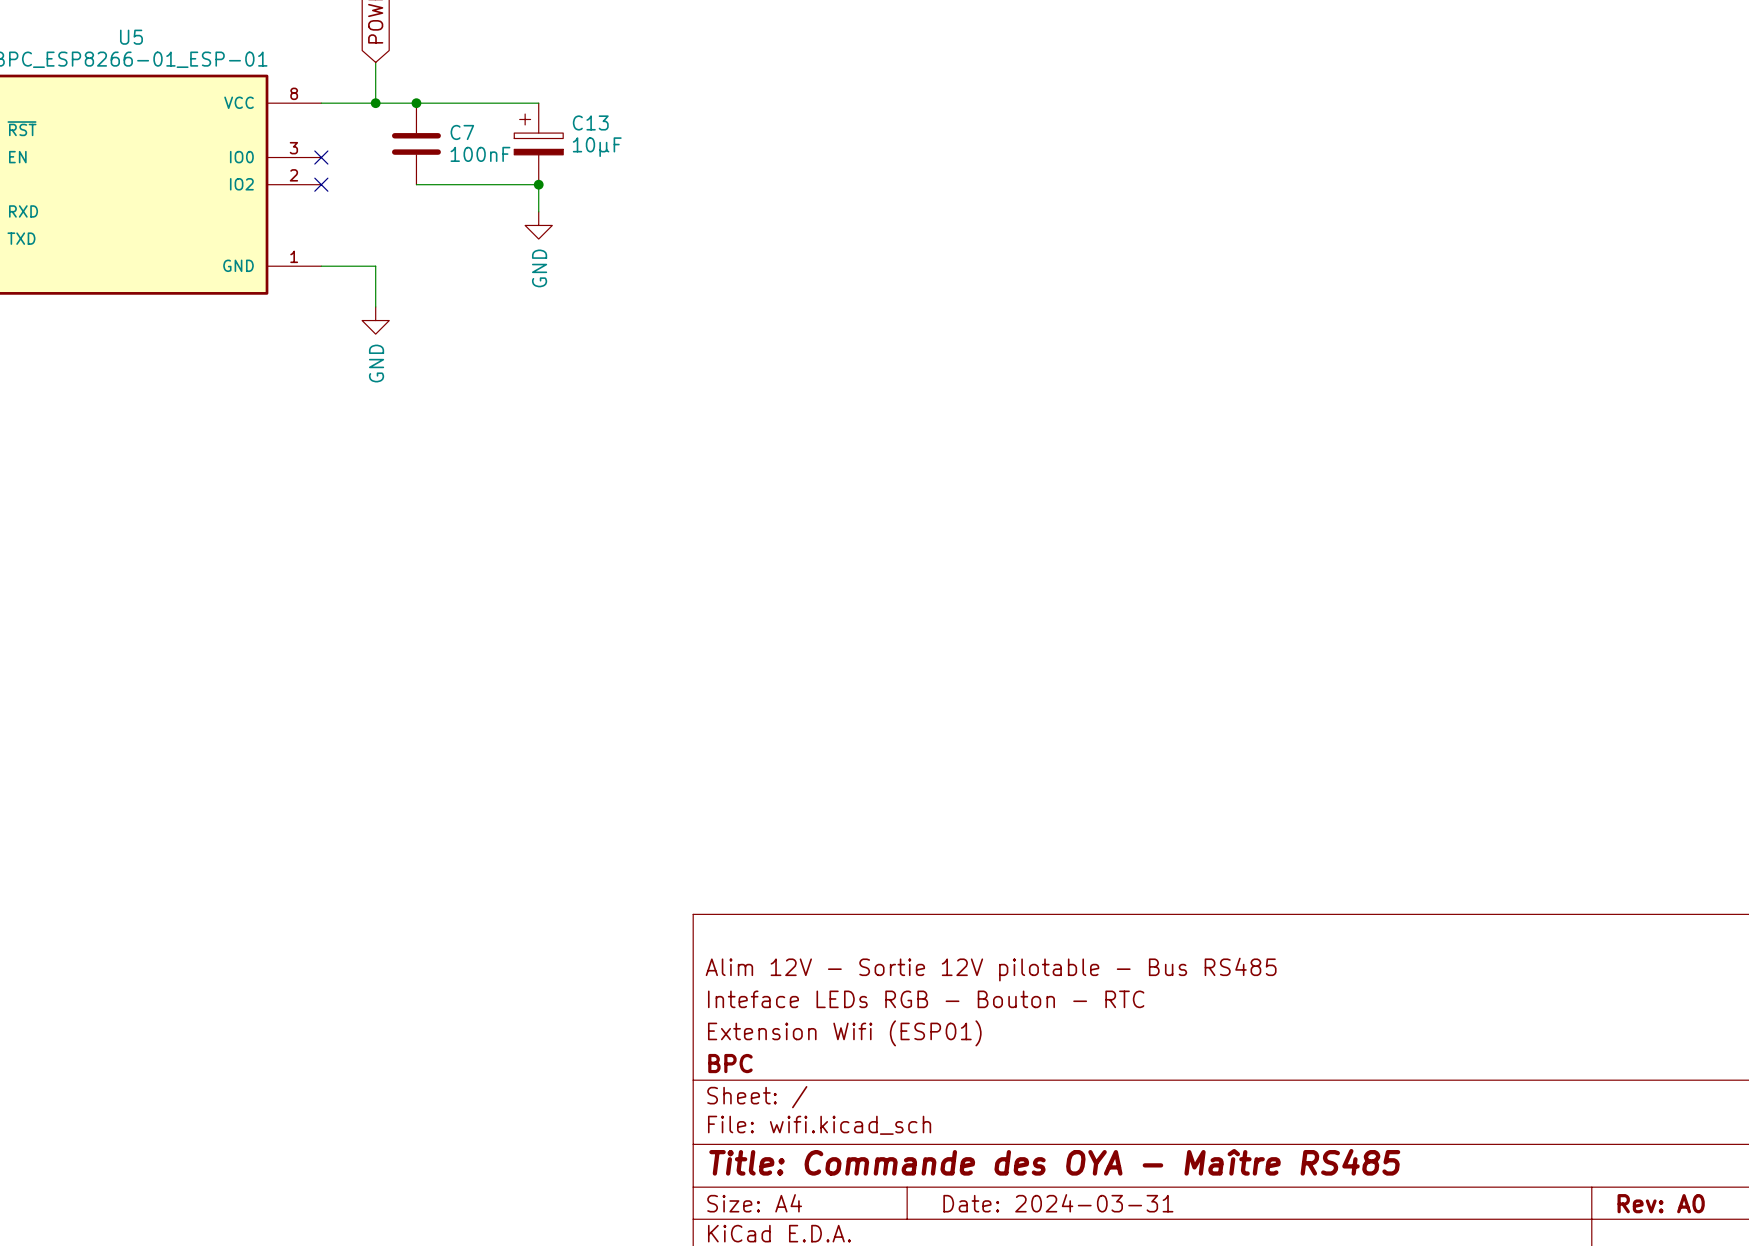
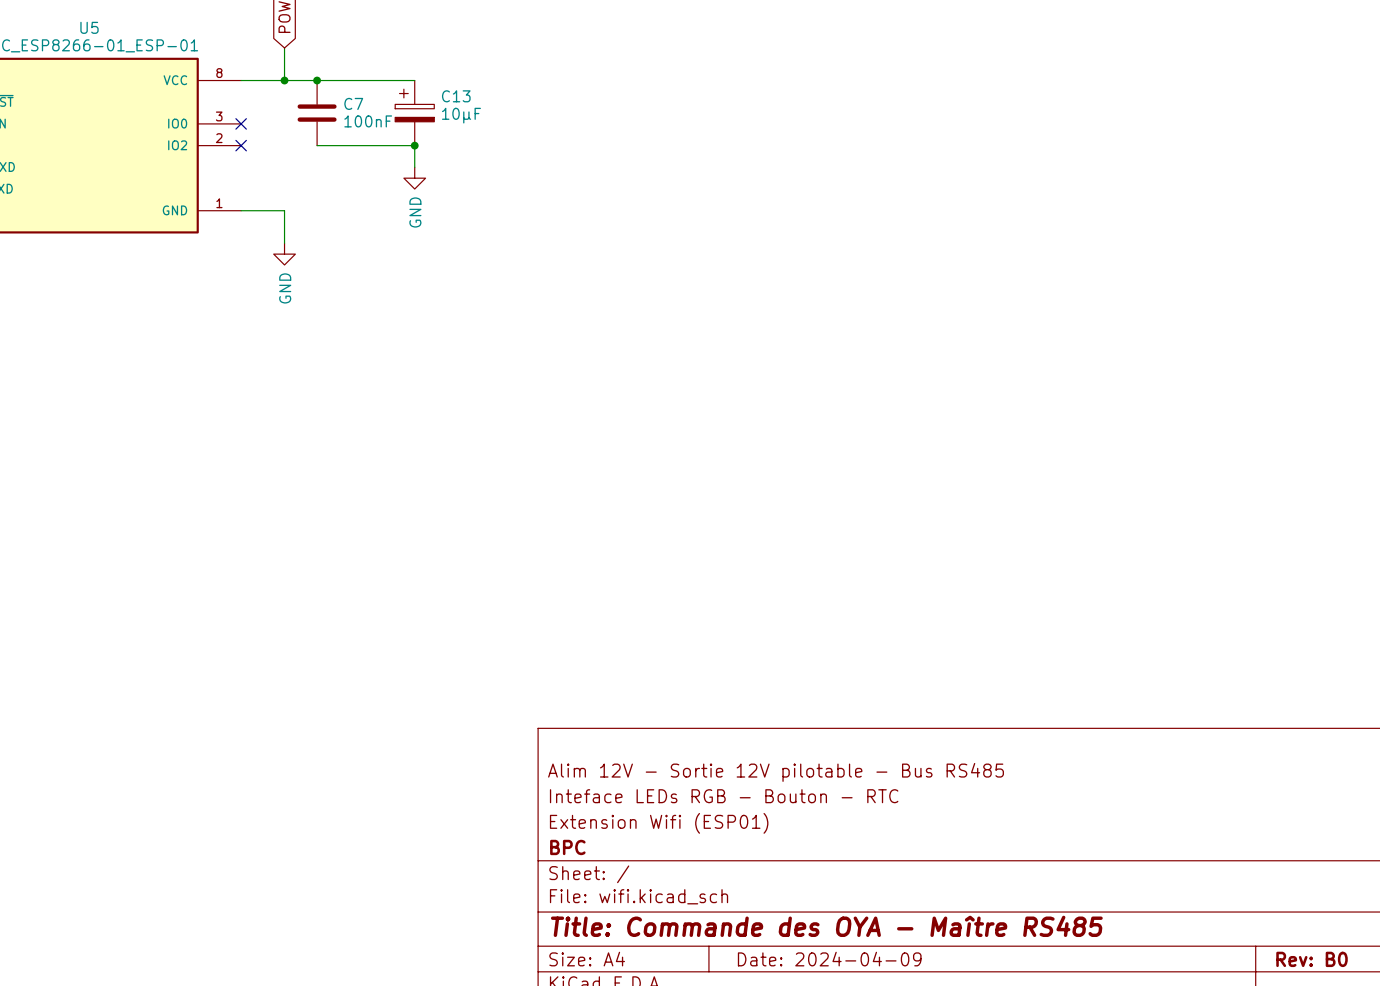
title block: Date: 2024-03-31 (1058, 1203) -> Date: 2024-04-09 (829, 959)
title block: Rev: A0 (1661, 1203) -> Rev: B0 (1312, 959)

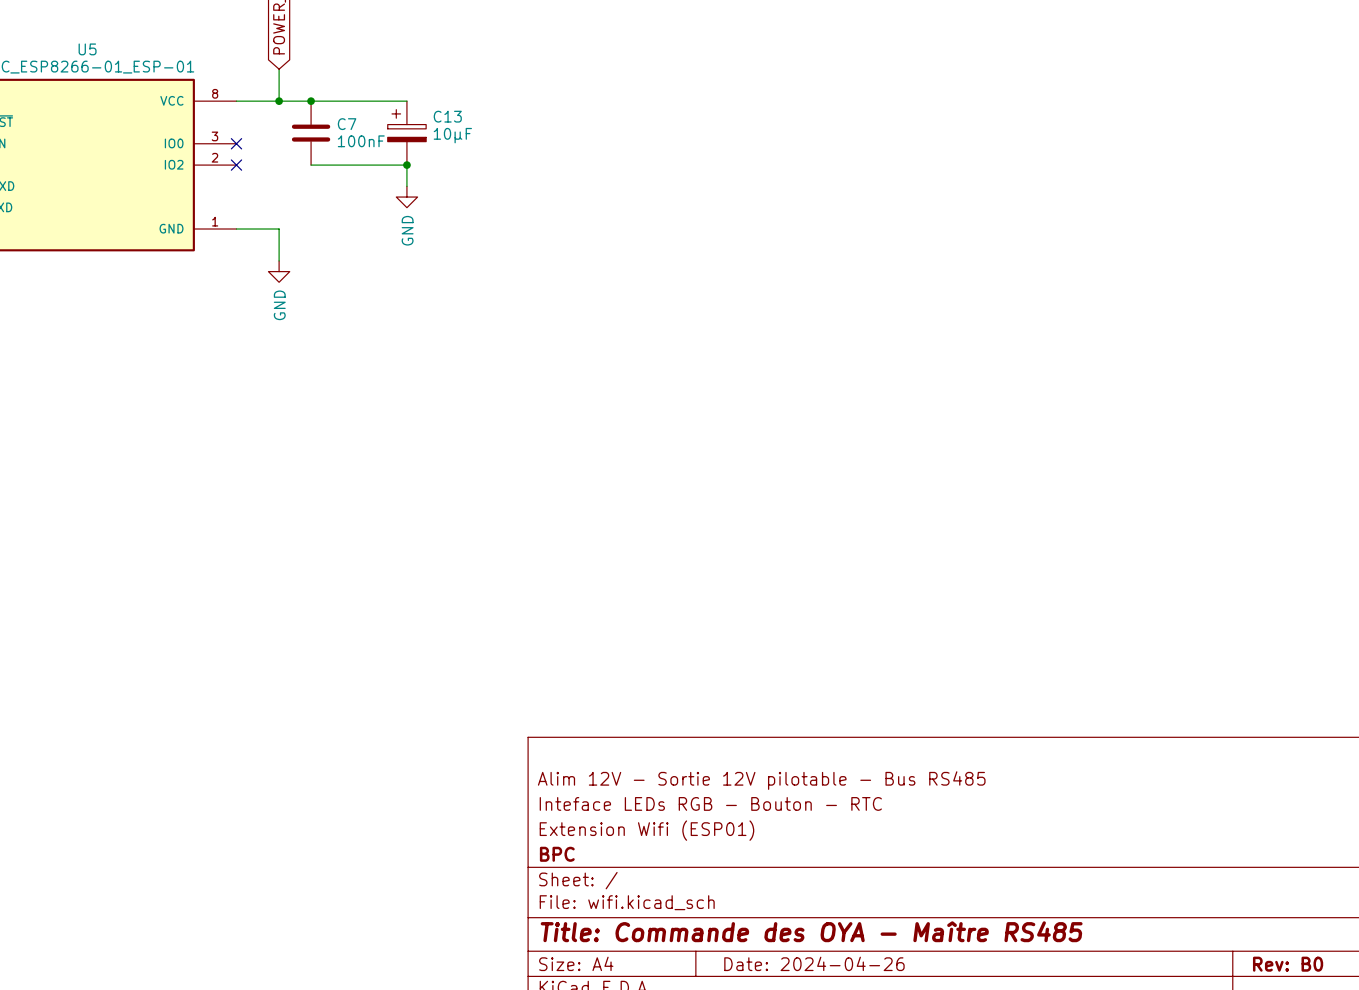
title block: Date: 2024-04-09 (829, 959) -> Date: 2024-04-26 (814, 963)

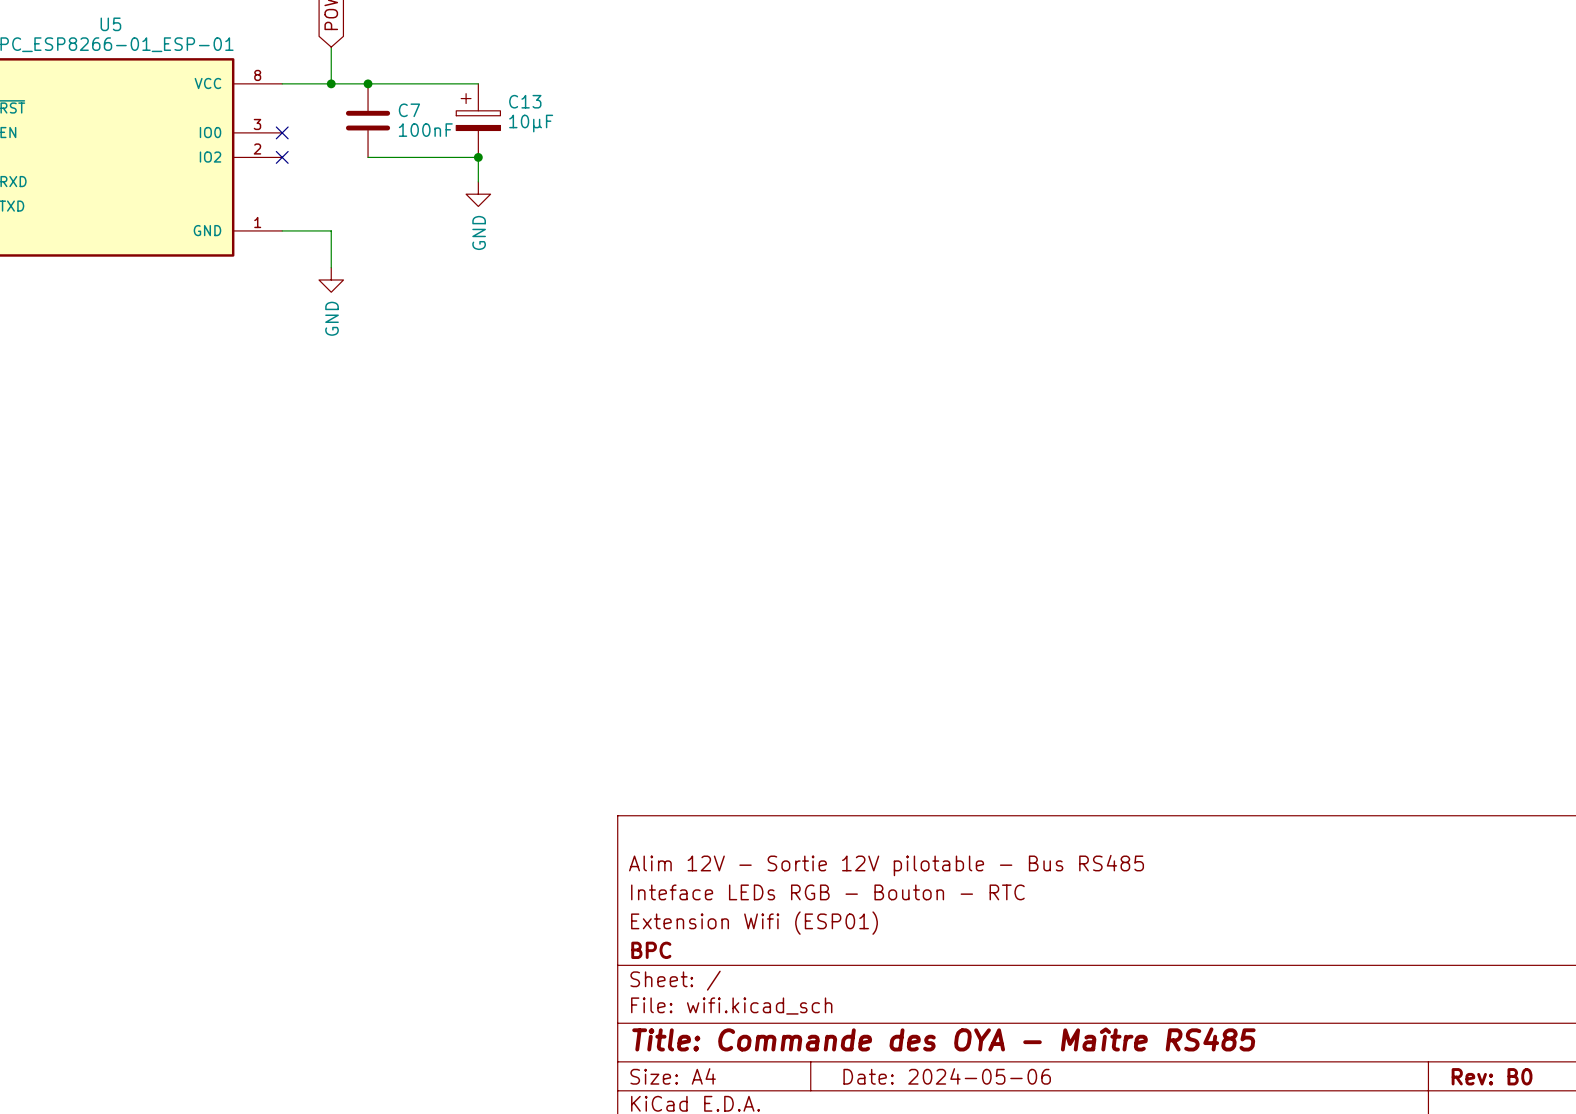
title block: Date: 2024-04-26 (814, 963) -> Date: 2024-05-06 (947, 1076)

